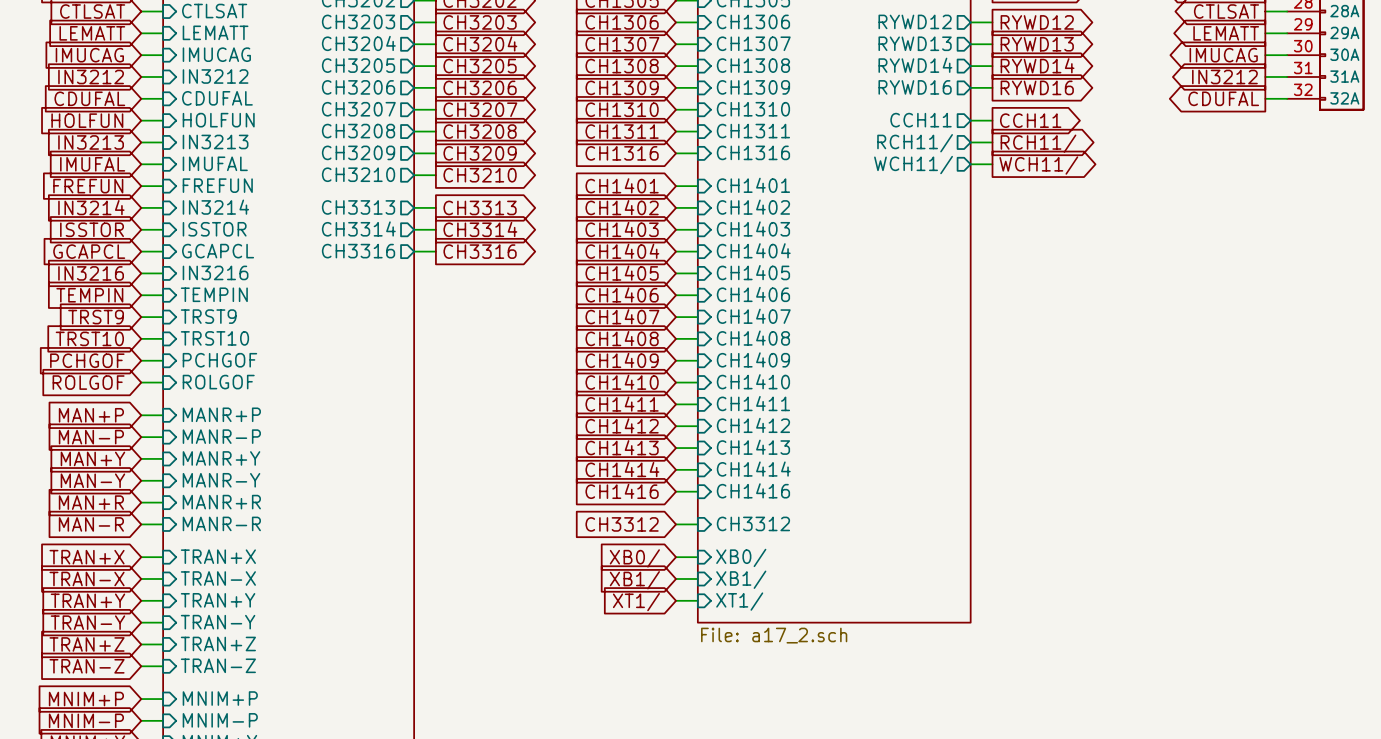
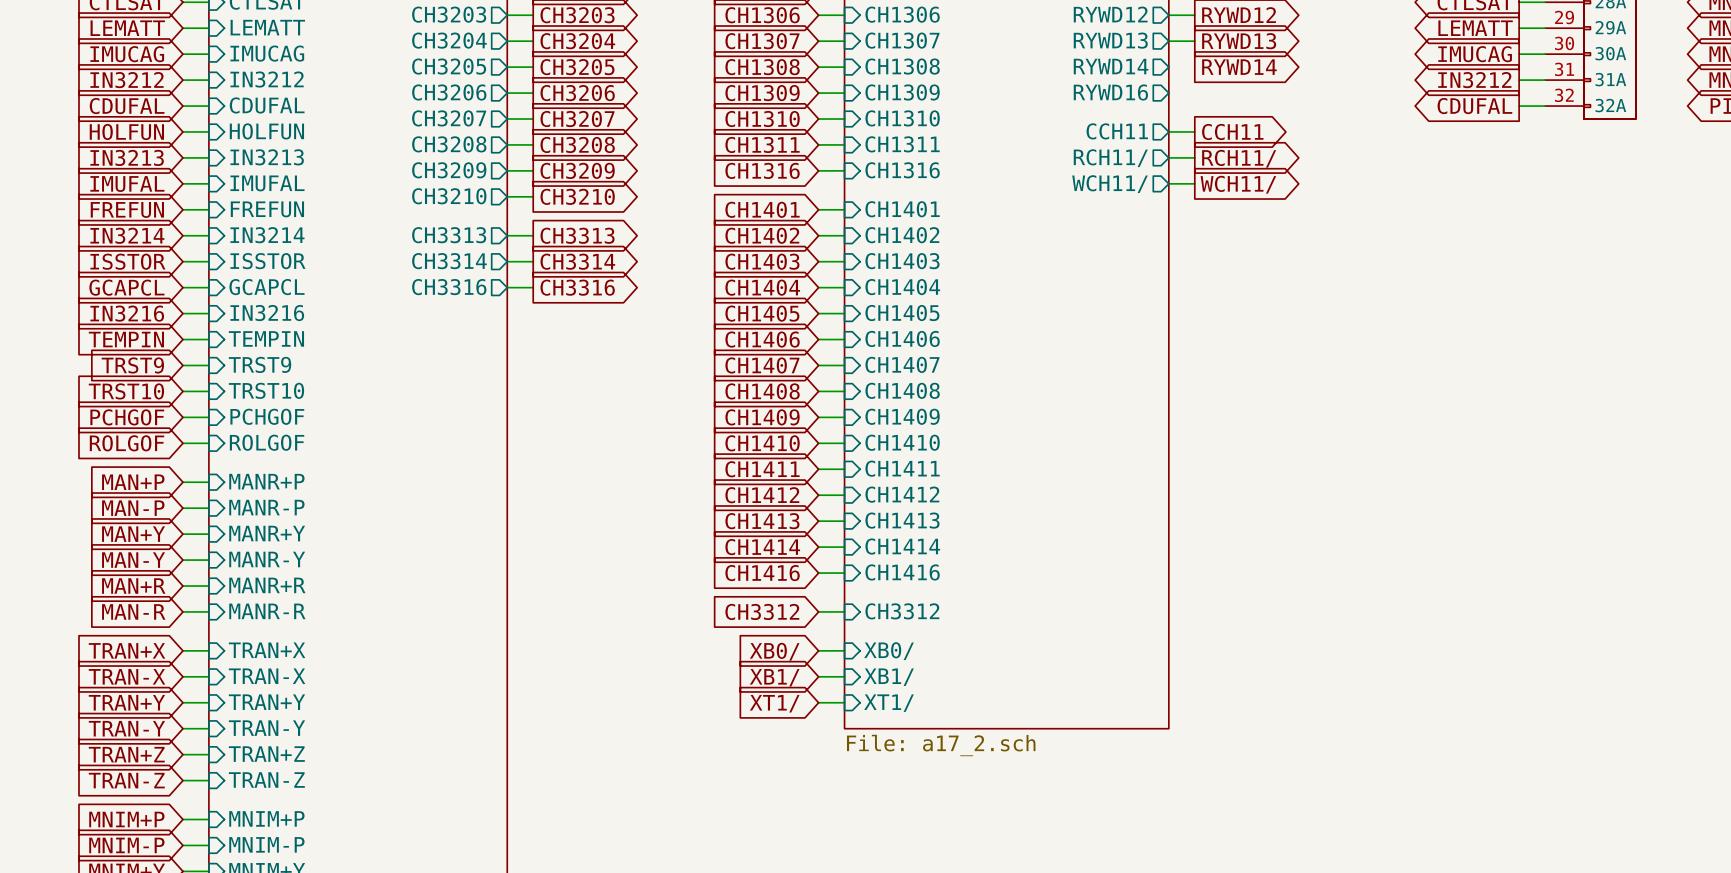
wire: (970, 66) (992, 66) -> none
wire: (970, 87) (992, 87) -> none
global label: RYWD16 (1037, 87) -> none

